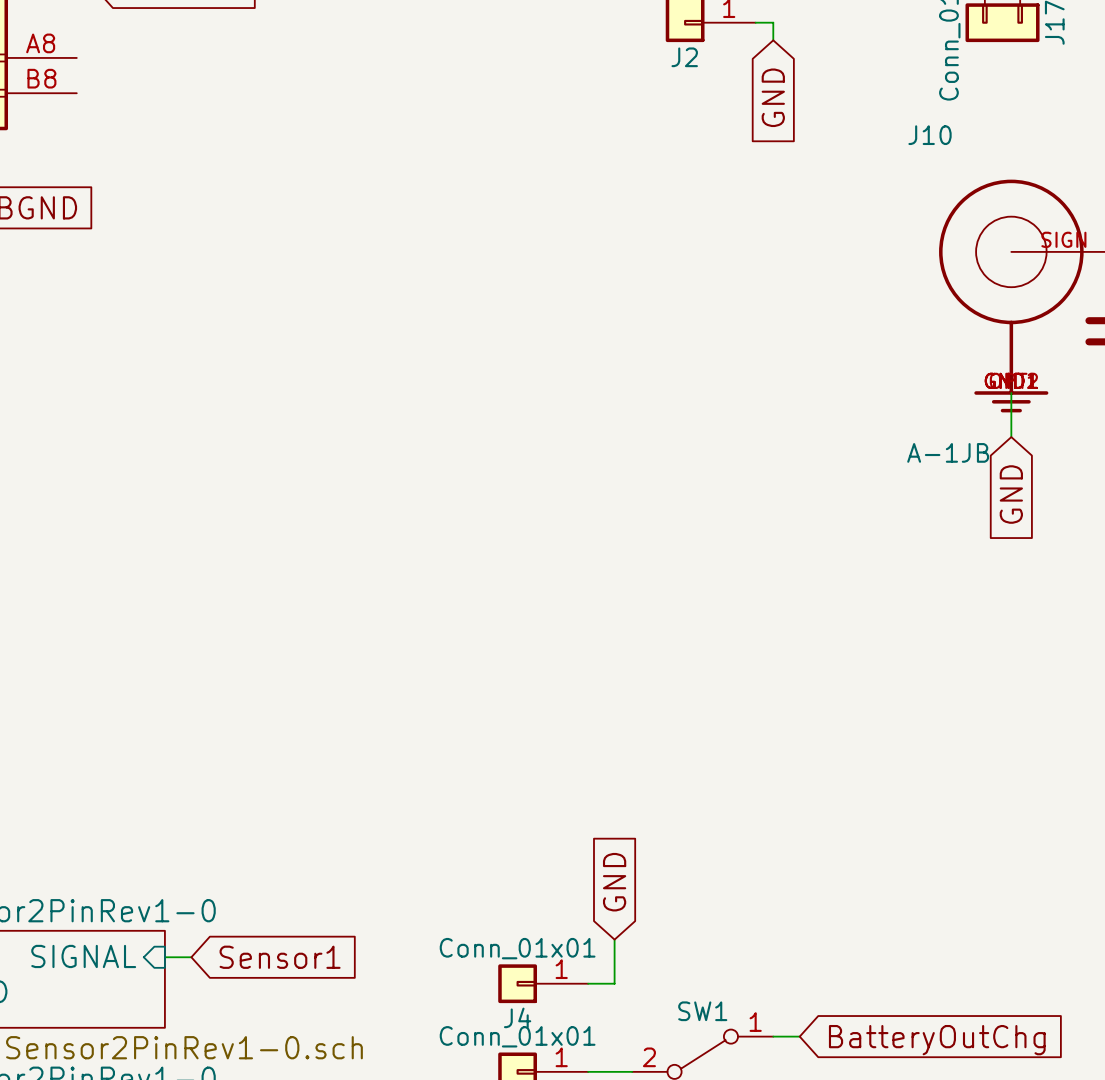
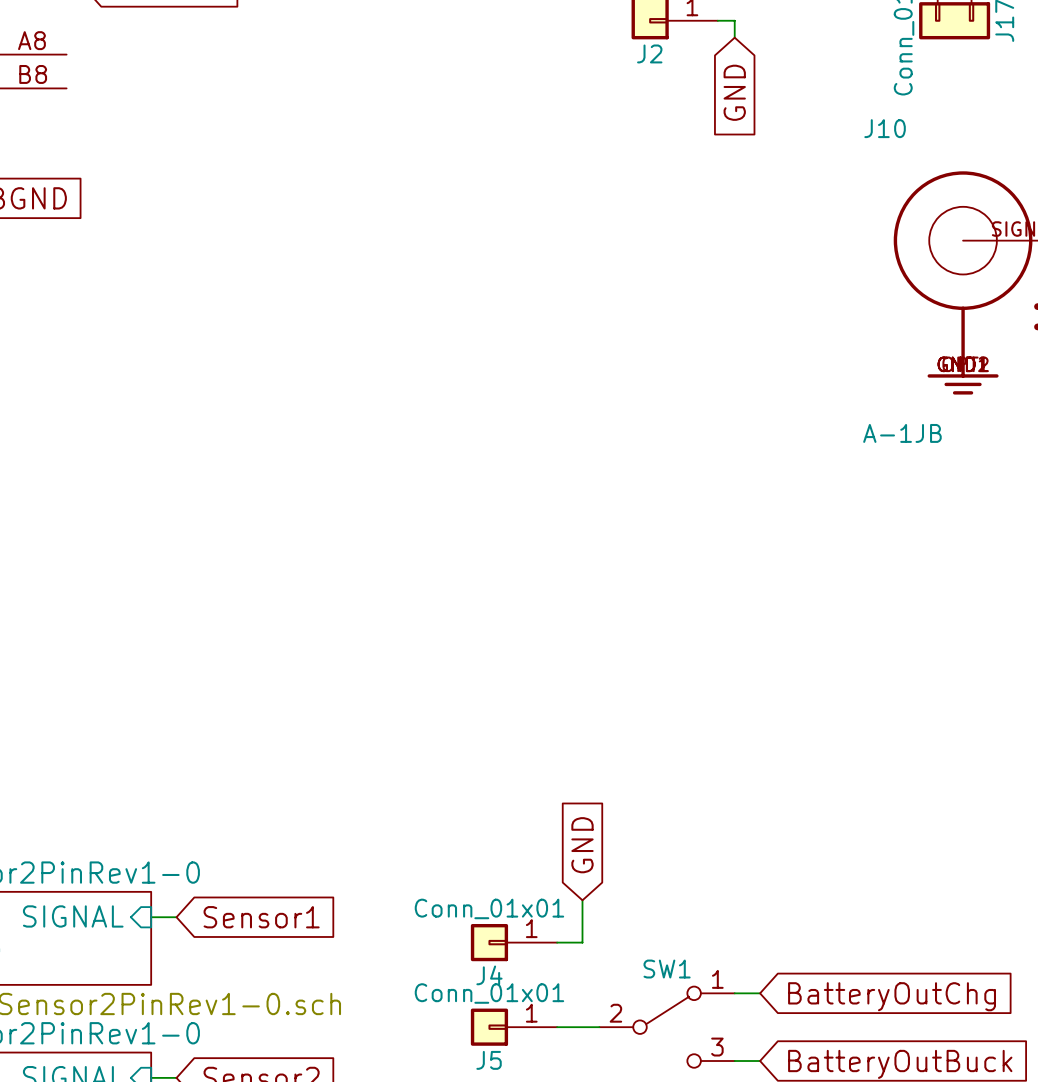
wire: (1011, 393) (1011, 437) -> none
global label: GND (1011, 494) -> none

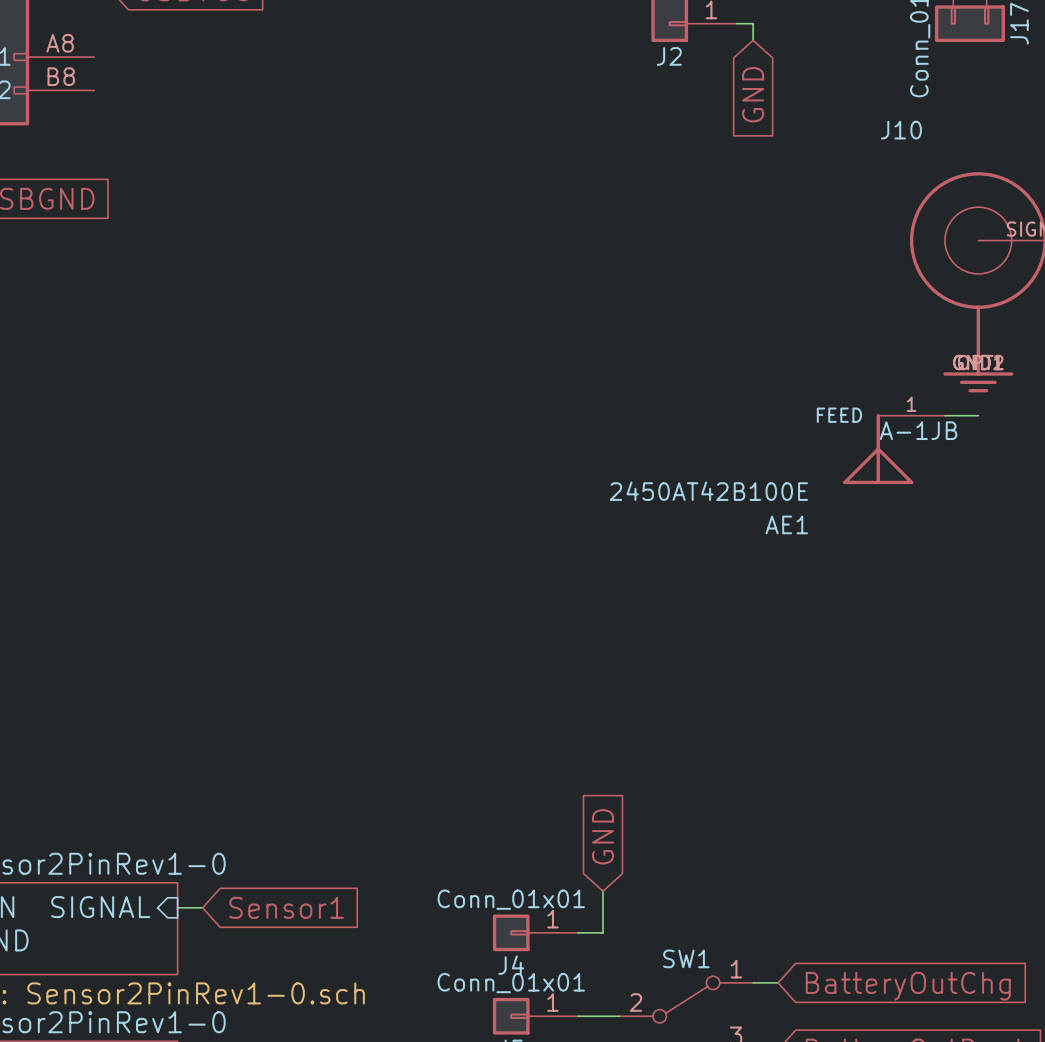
wire: none -> (944, 415) (978, 415)
AE1: none -> 2450AT42B100E (894, 449)

